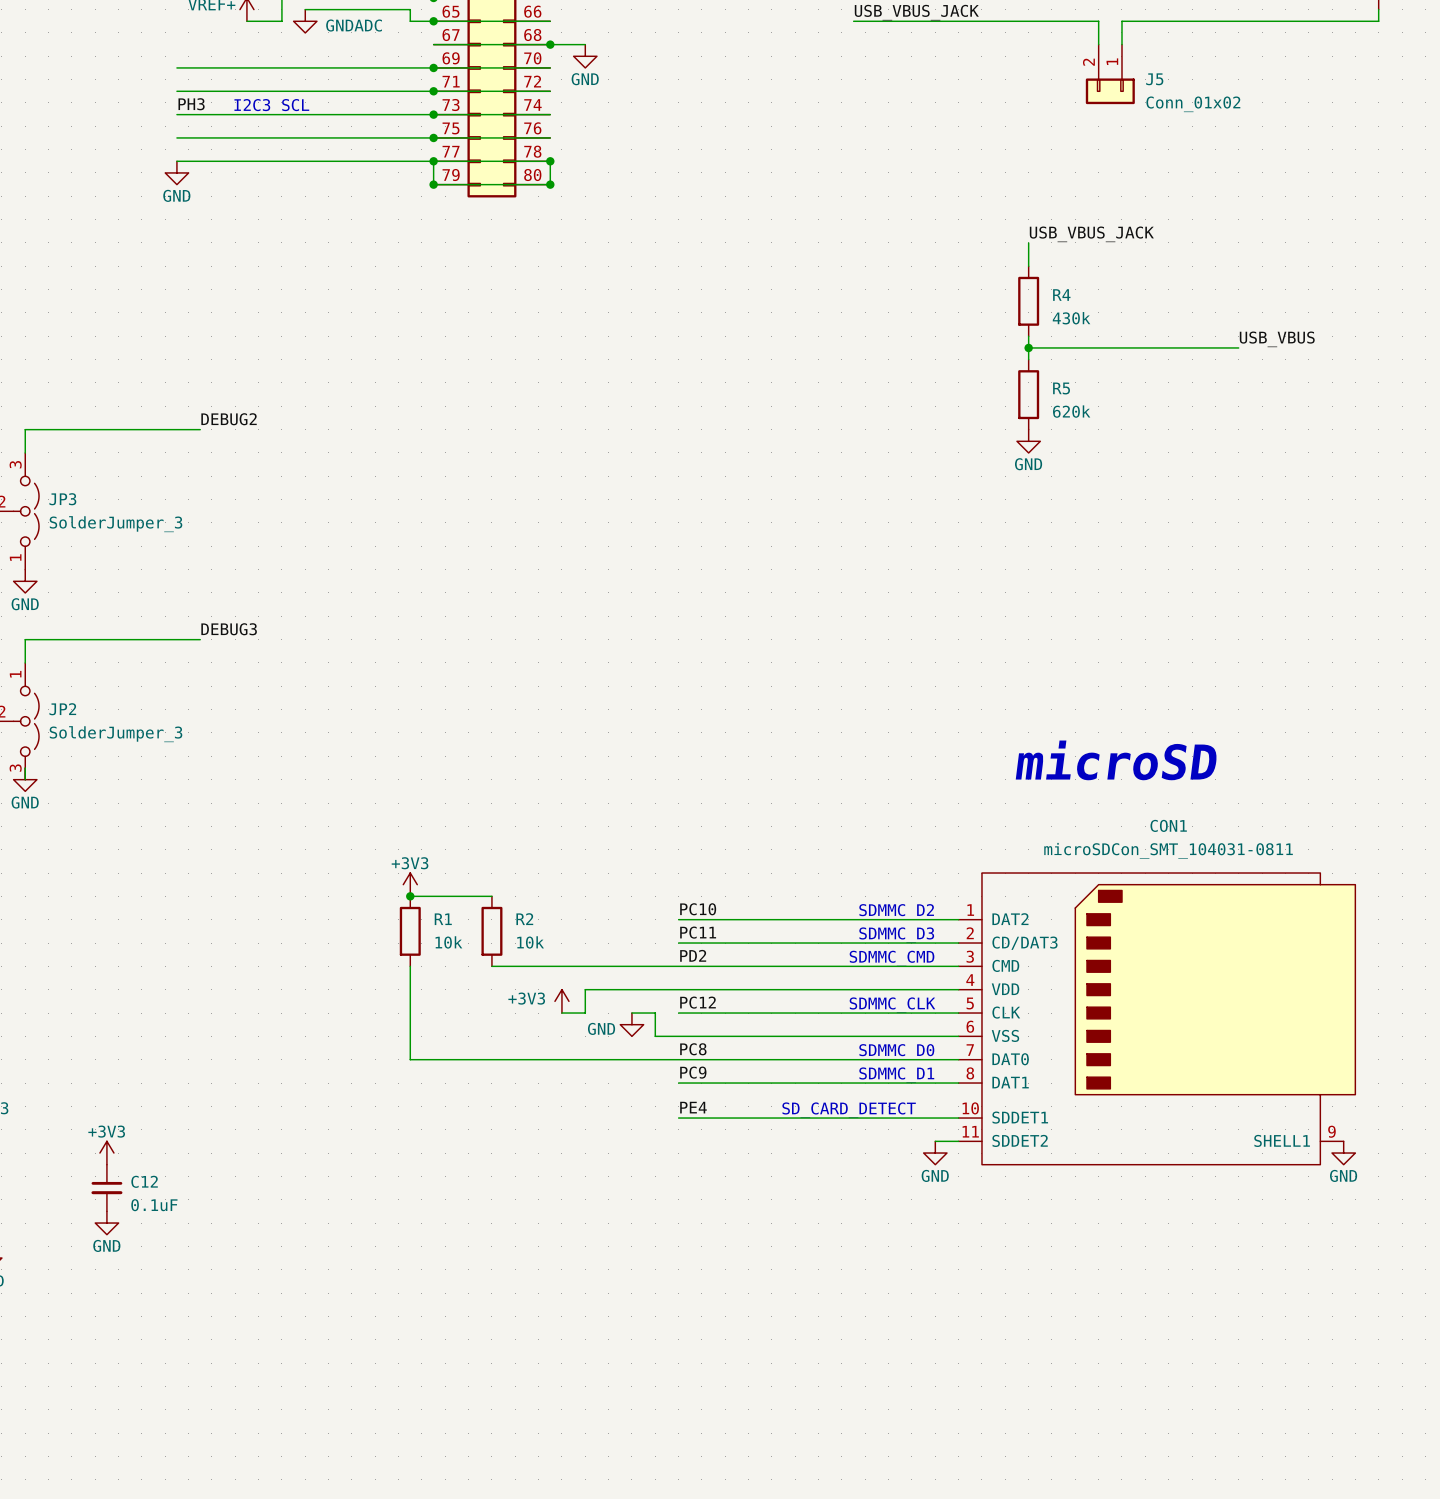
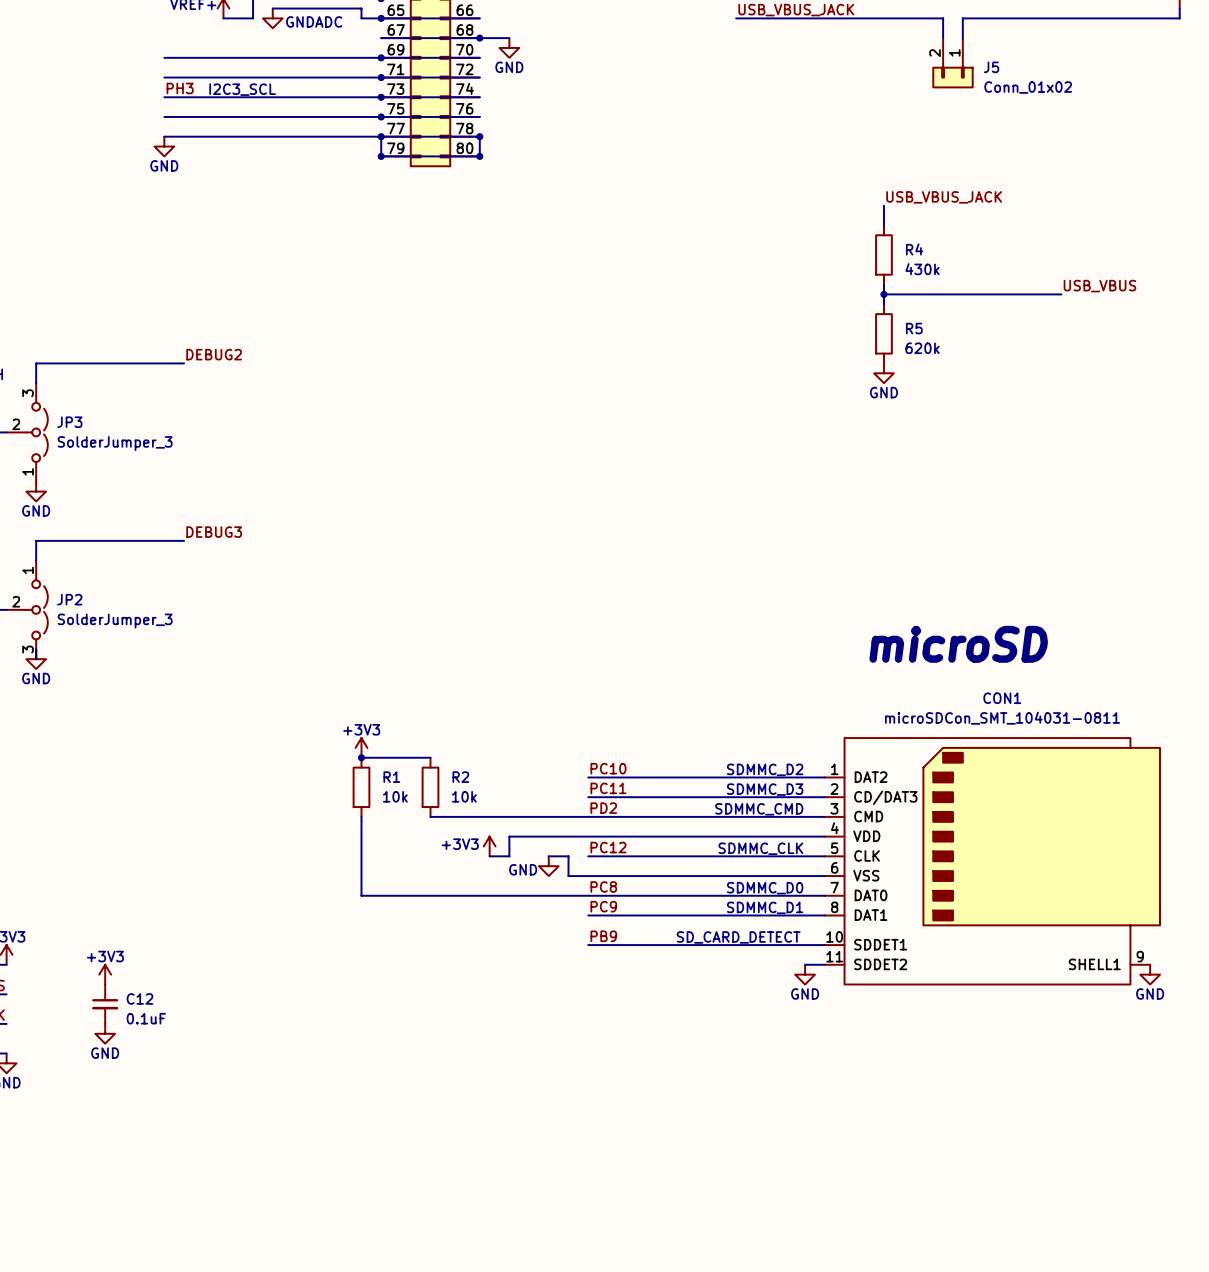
label: PE4 (693, 1107) -> PB9 (603, 936)

